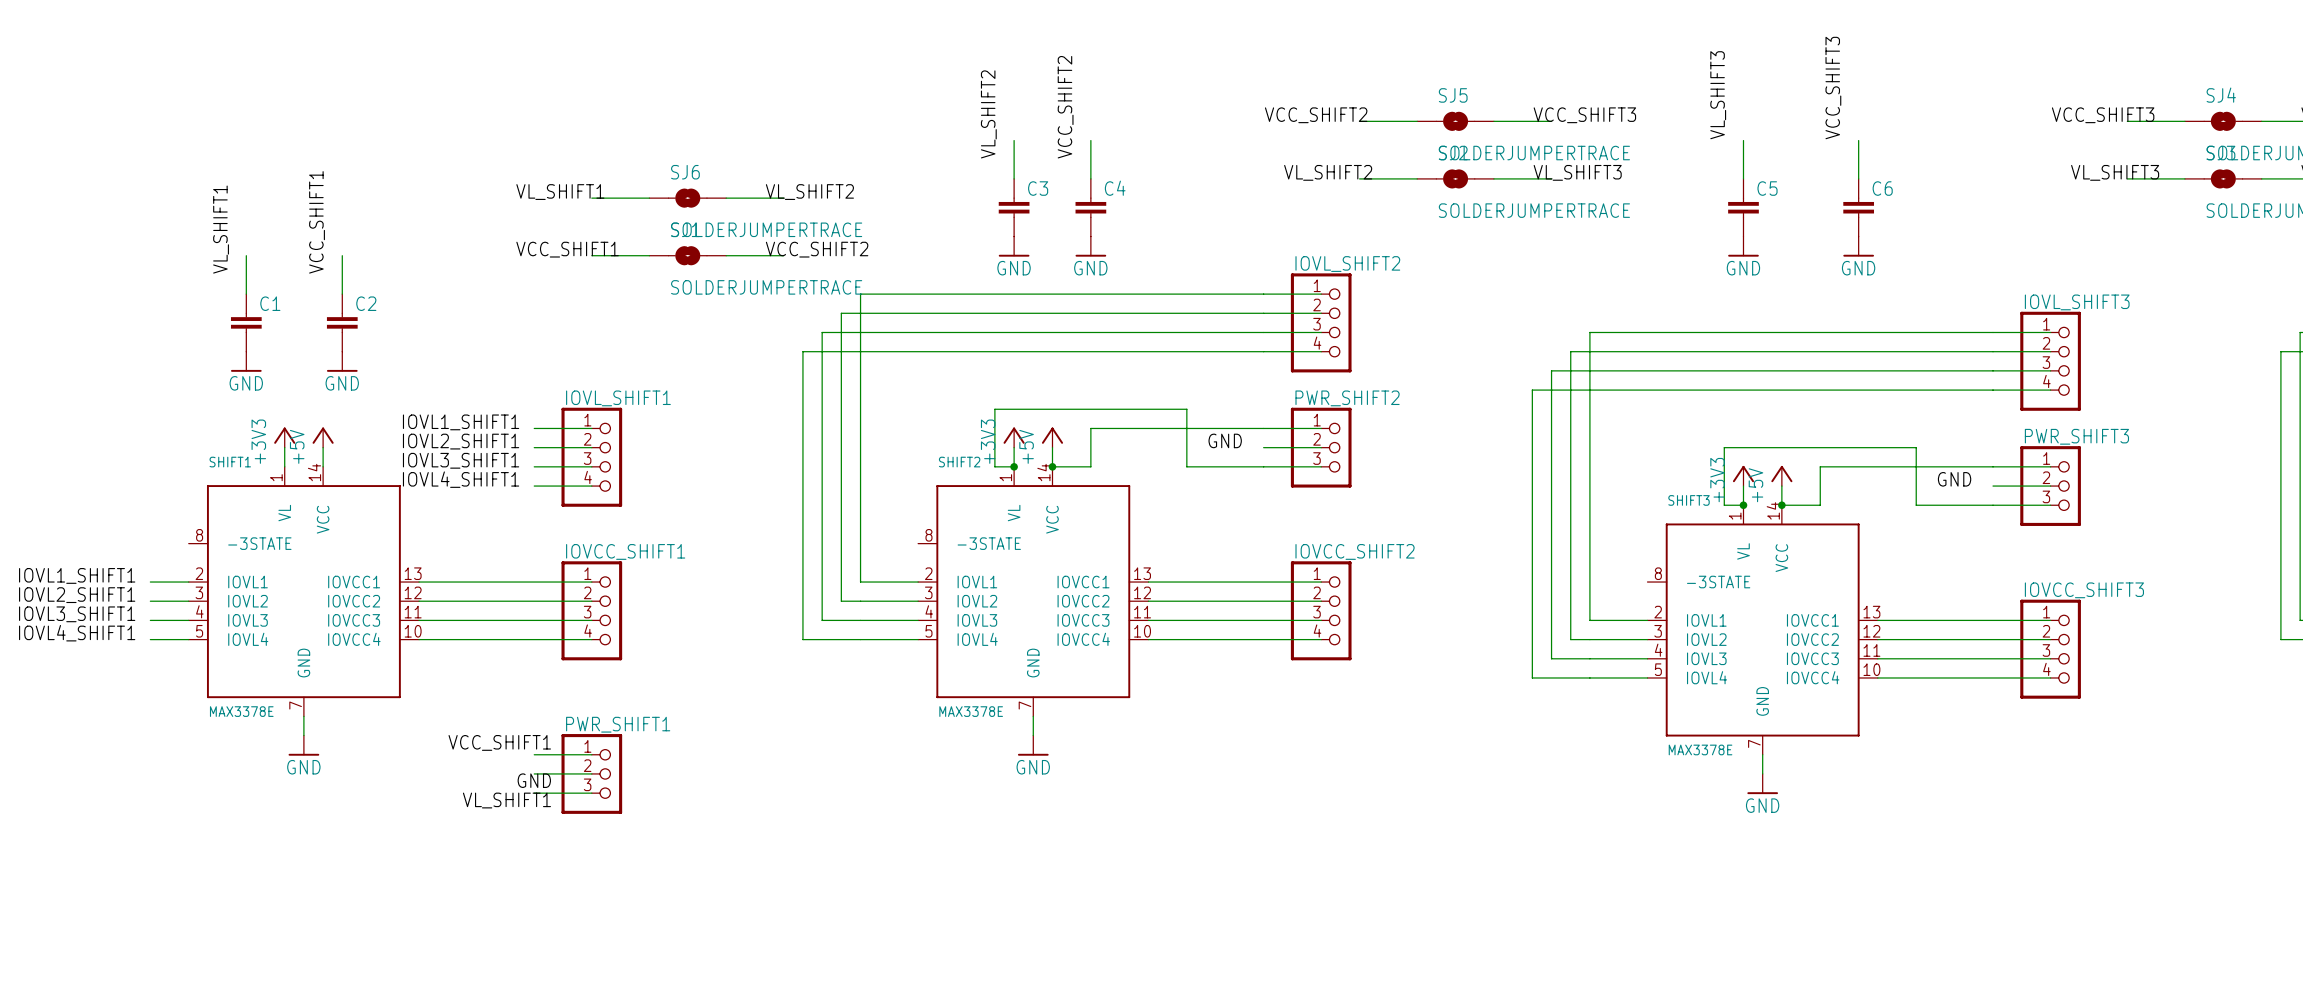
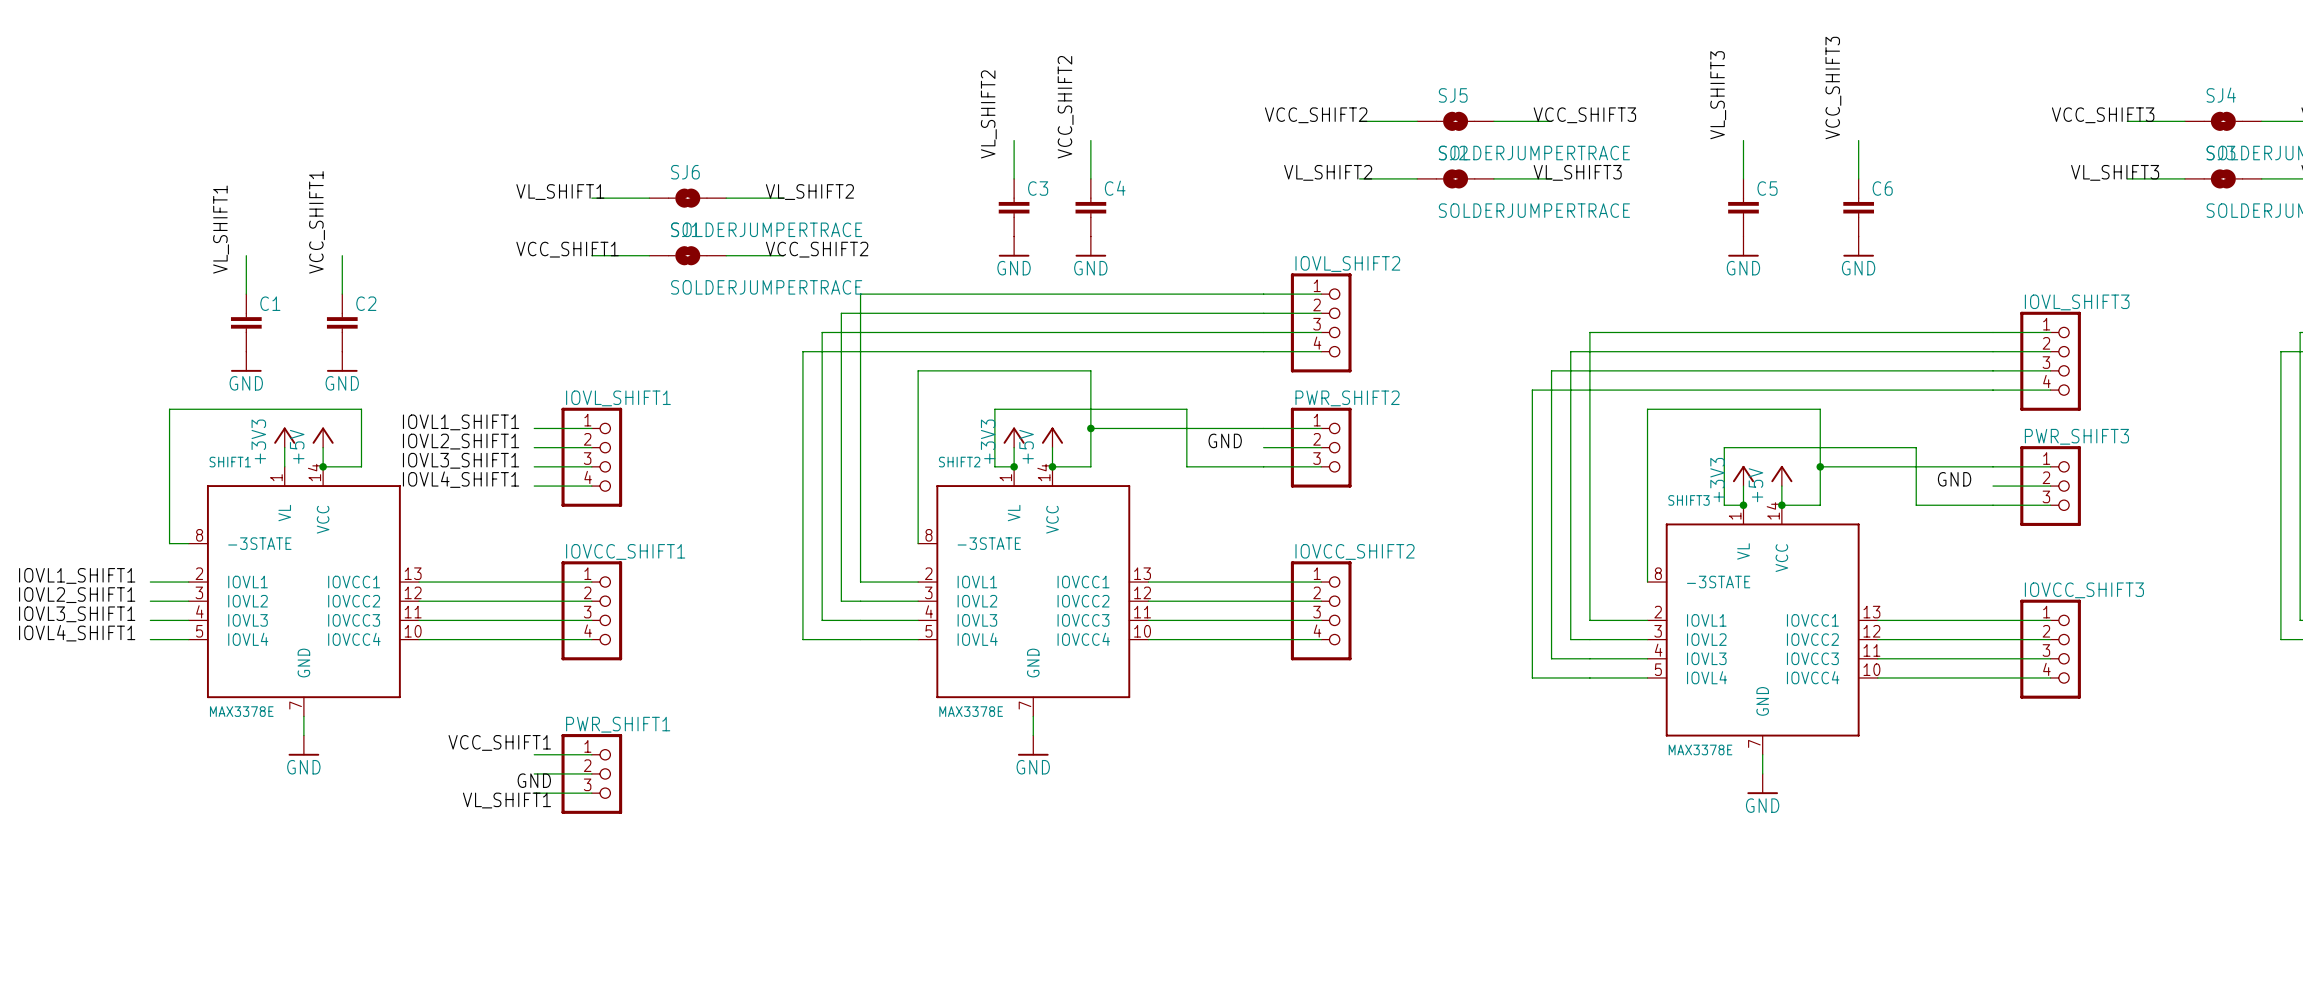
wire: none -> (1090, 428) (1090, 370) (918, 370) (918, 543)
junction: none -> (1090, 428)
wire: none -> (323, 466) (361, 466) (361, 409) (169, 409) (169, 543) (188, 543)
junction: none -> (323, 466)
wire: none -> (1820, 466) (1820, 409) (1647, 409) (1647, 582)
junction: none -> (1820, 466)

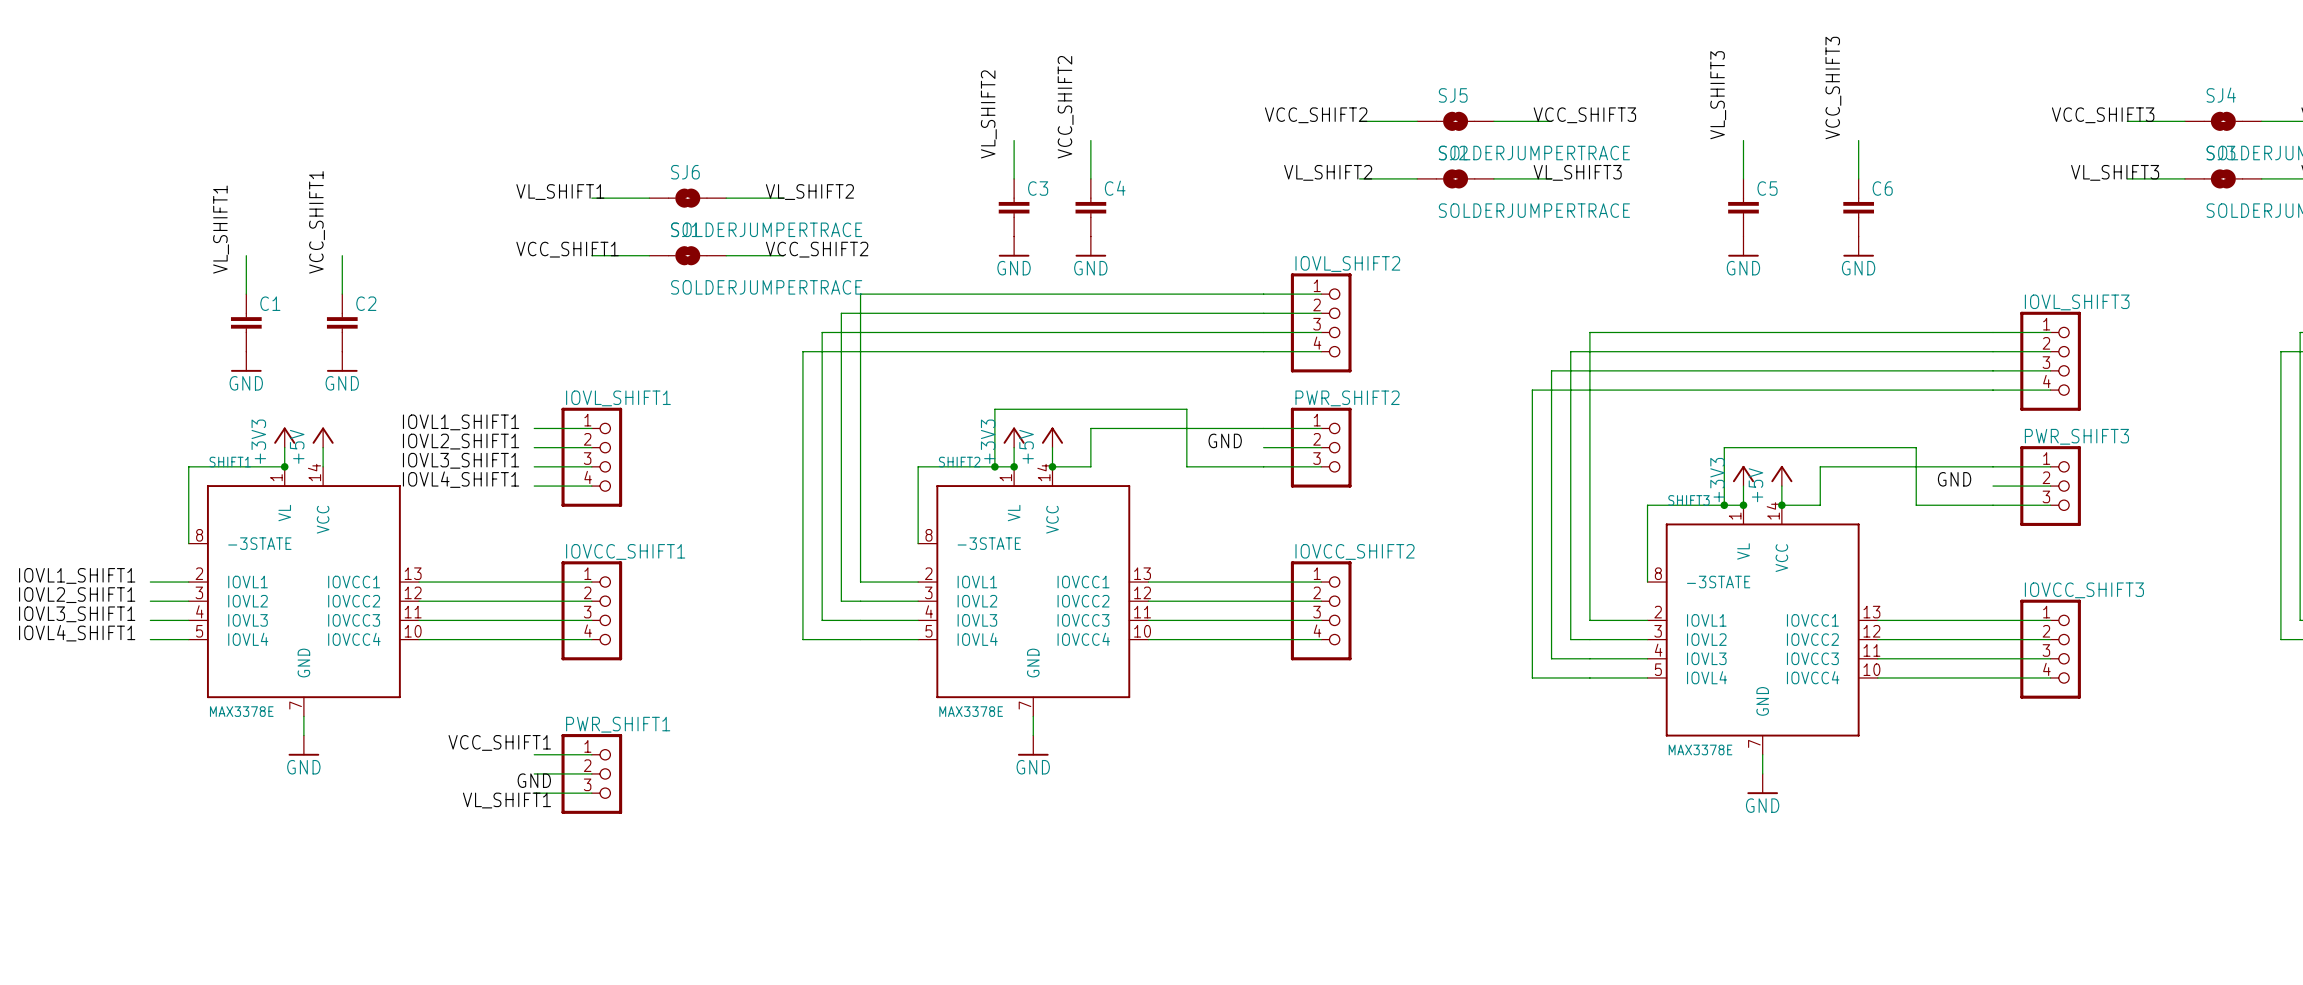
wire: (1090, 428) (1090, 370) (918, 370) (918, 466) -> (994, 466) (918, 466)
junction: (1090, 428) -> none
wire: (323, 466) (361, 466) (361, 409) (169, 409) (169, 543) (188, 543) -> (284, 466) (188, 466) (188, 543)
junction position: (323, 466) -> (284, 466)
junction: none -> (994, 466)
wire: (1820, 466) (1820, 409) (1647, 409) (1647, 505) -> (1724, 505) (1647, 505)
junction: (1820, 466) -> none
junction: none -> (1724, 505)

